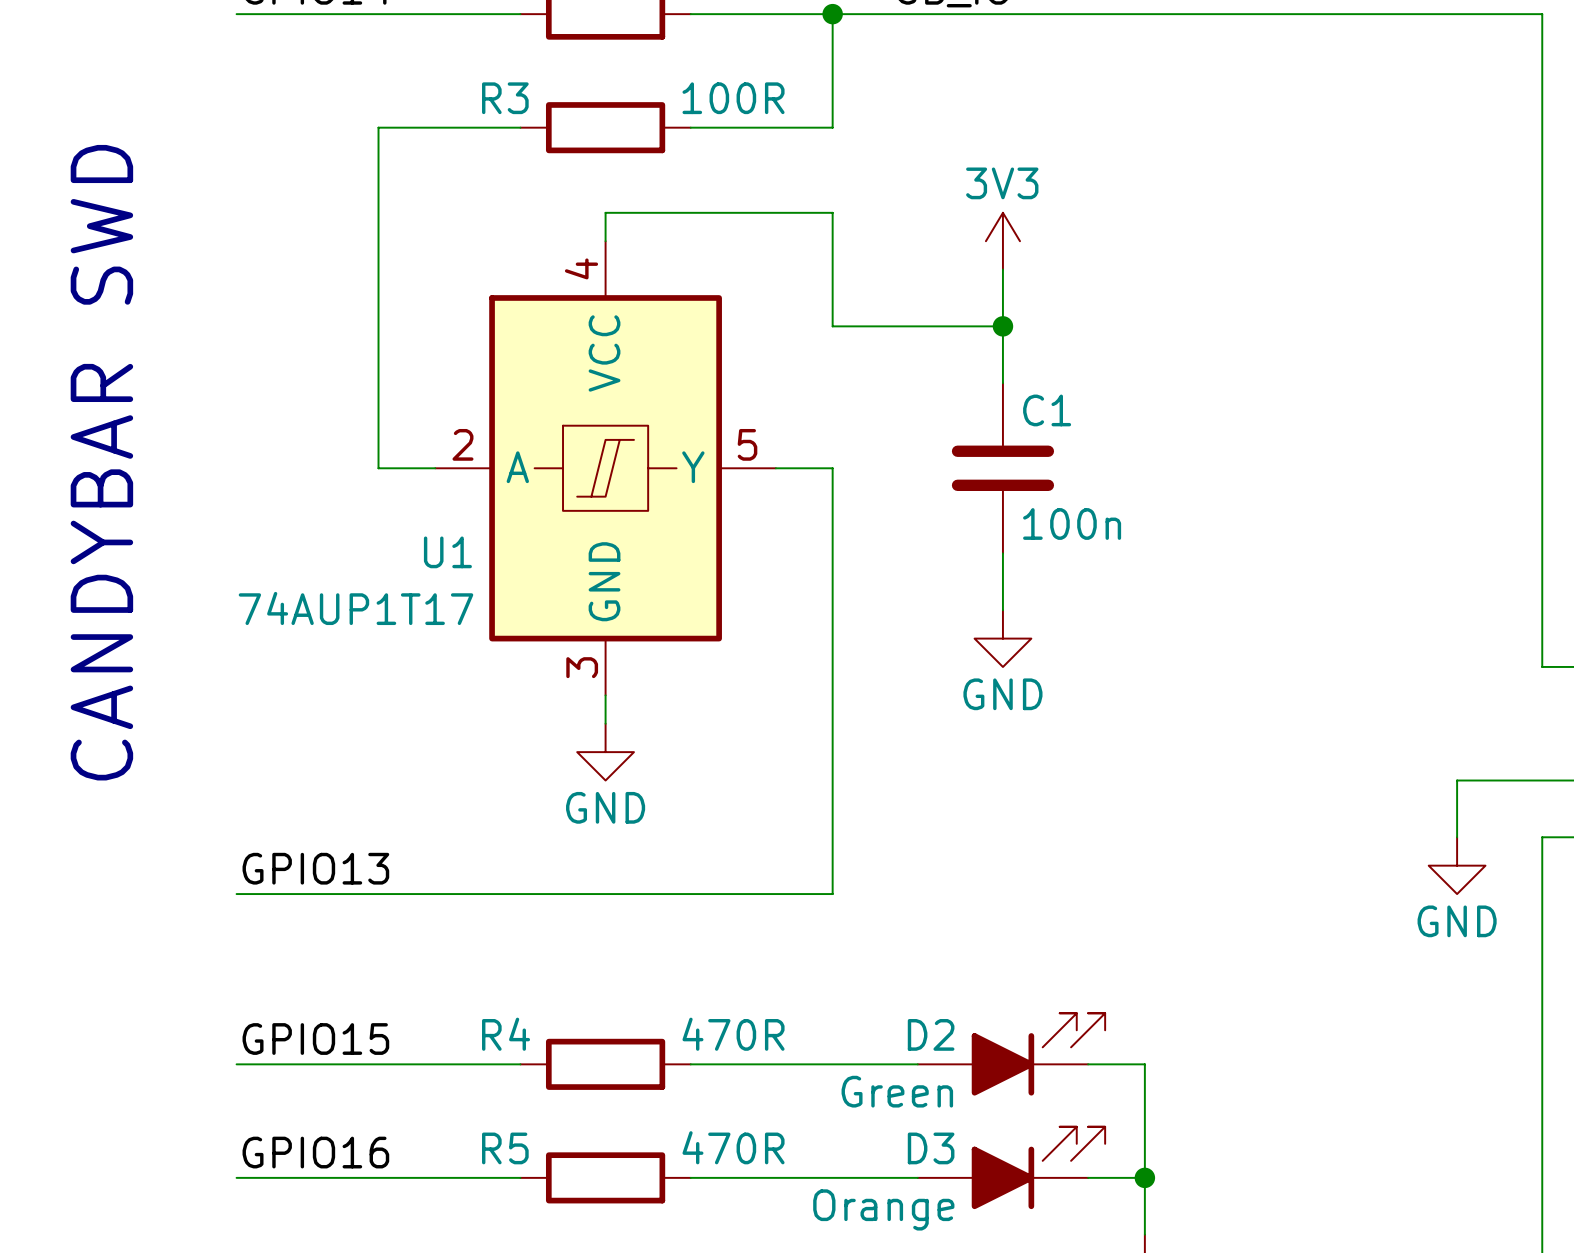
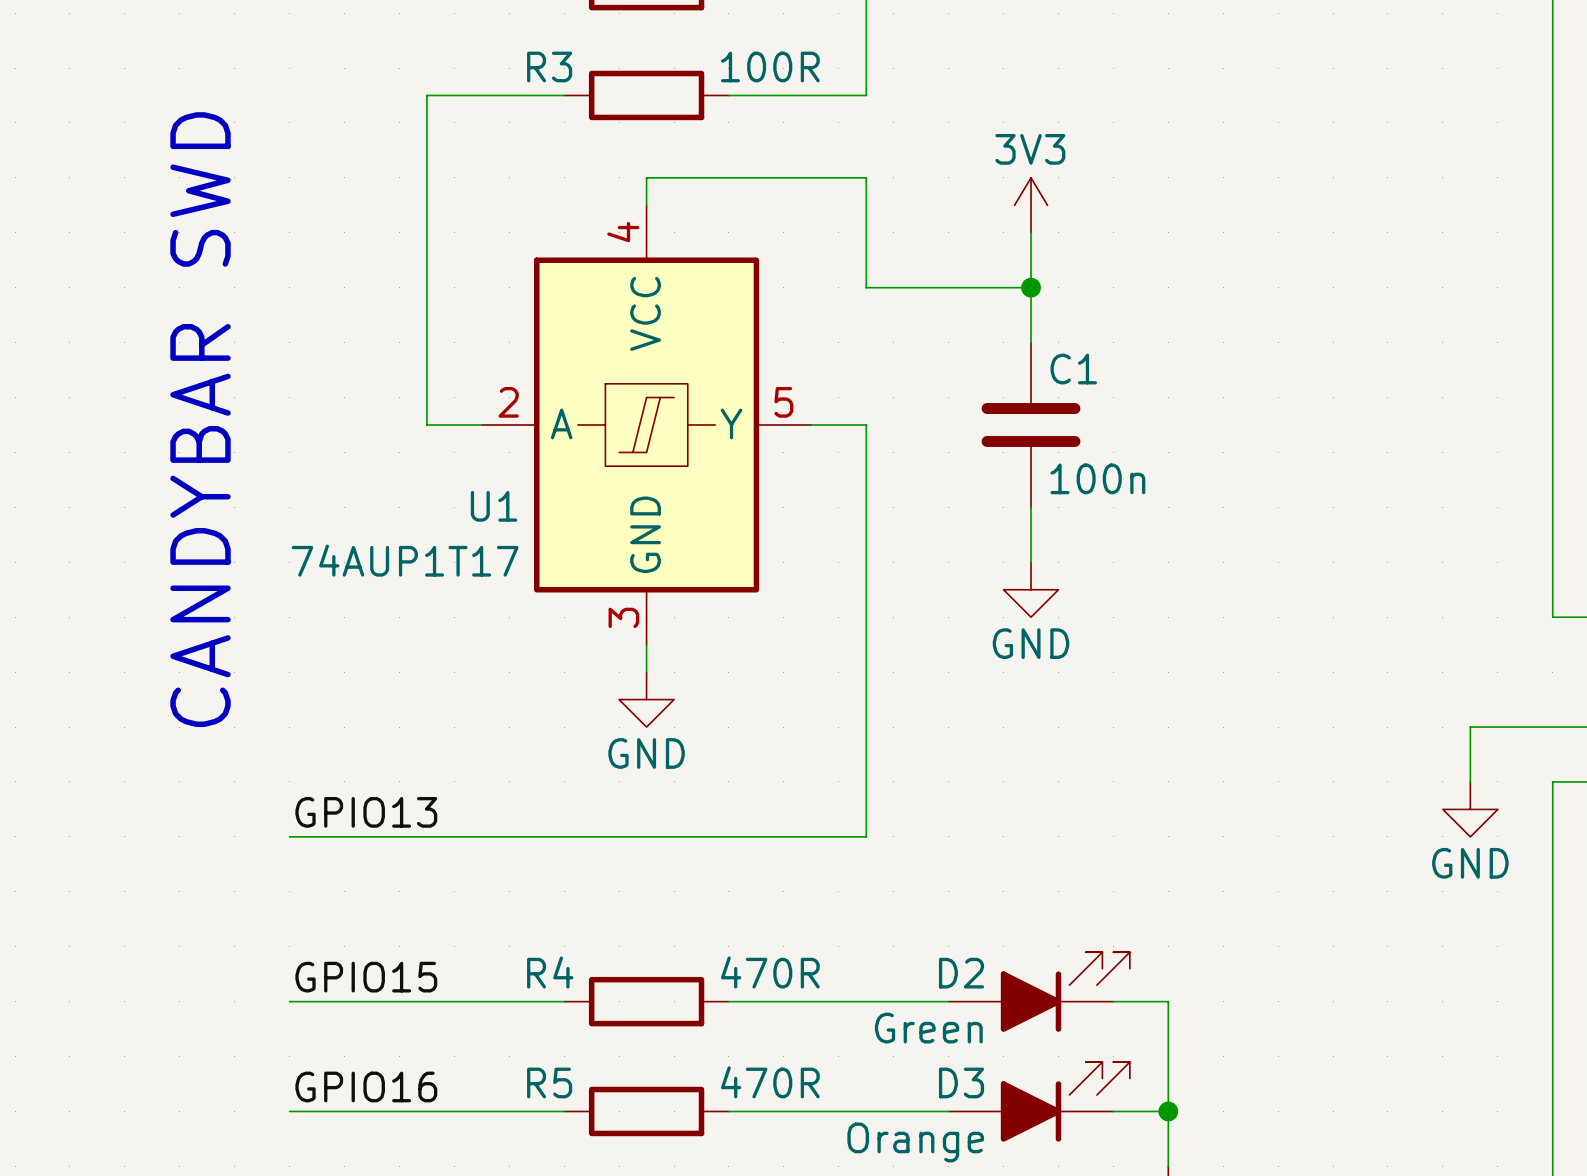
text position: CANDYBAR SWD (101, 462) -> CANDYBAR SWD (200, 419)

